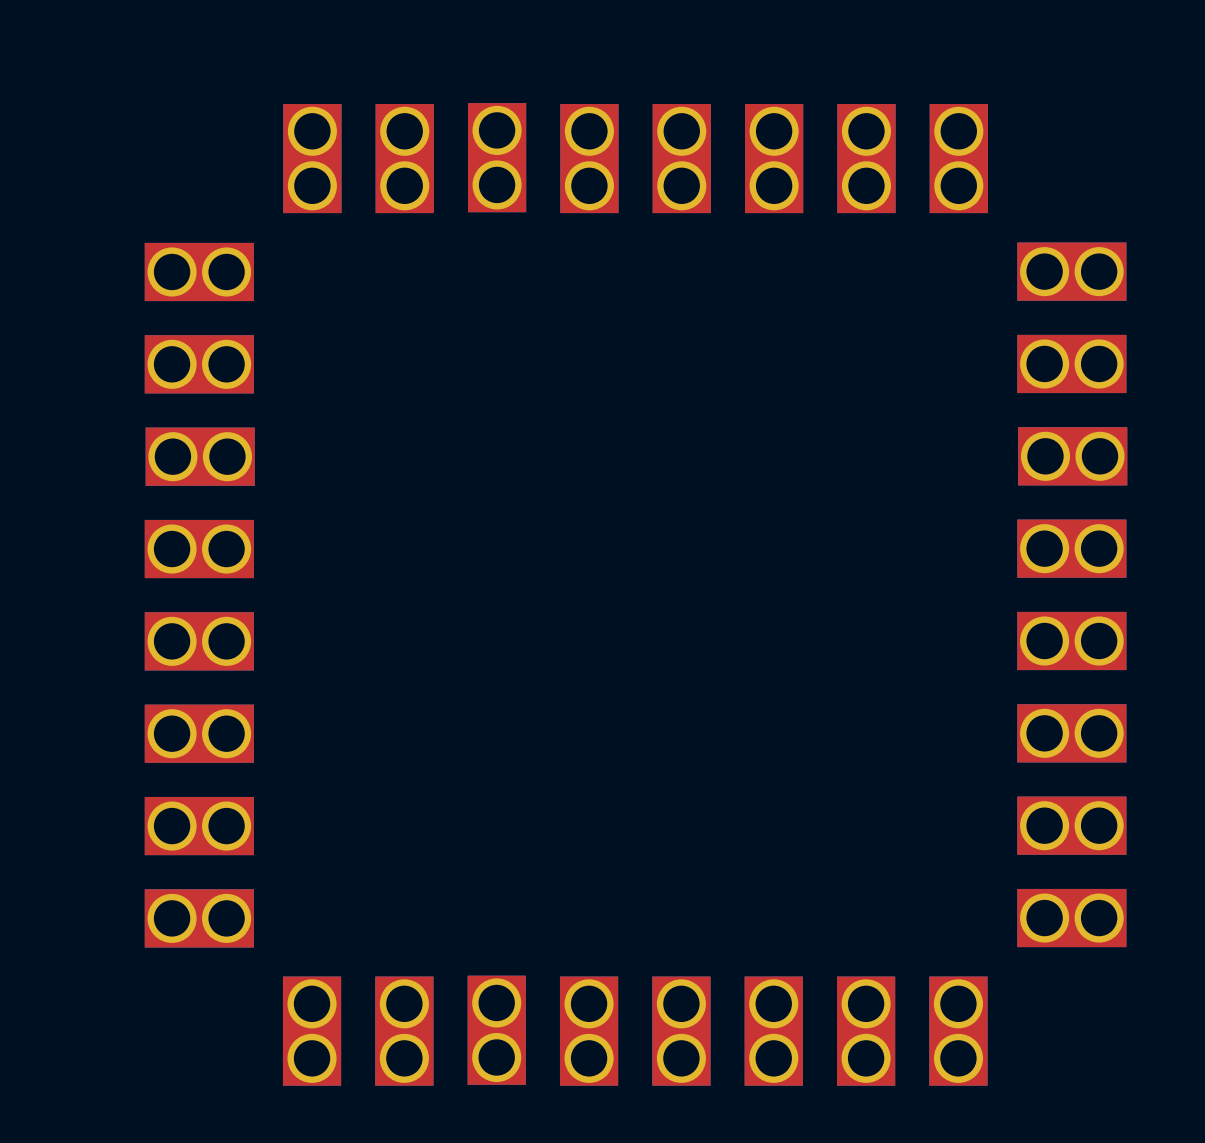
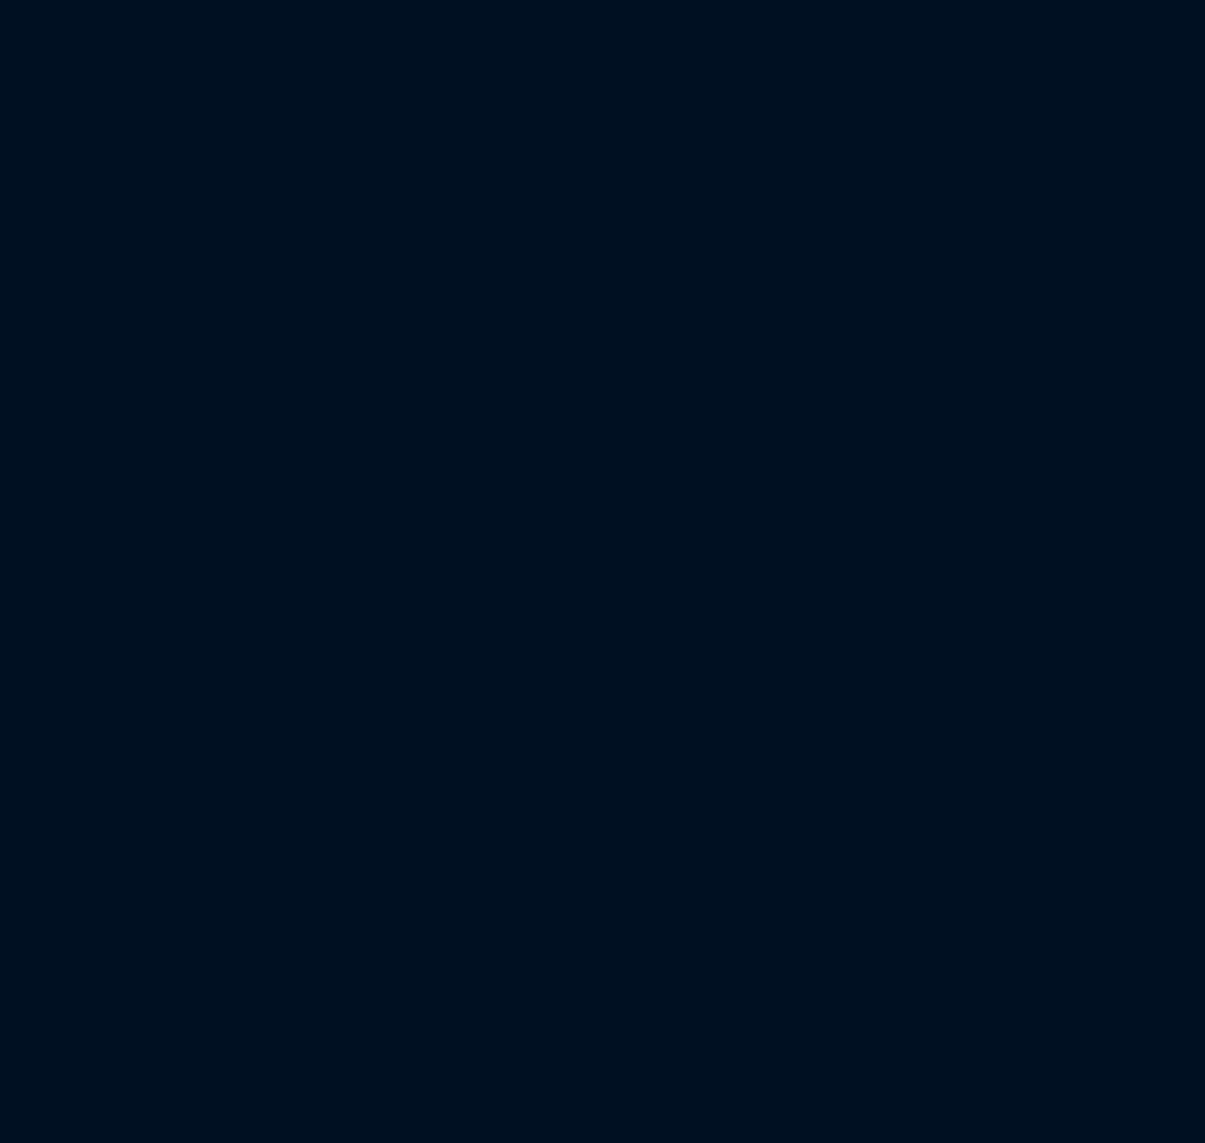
part: (635, 158) -> none
part: (1072, 594) -> none
part: (199, 595) -> none
part: (635, 1030) -> none

